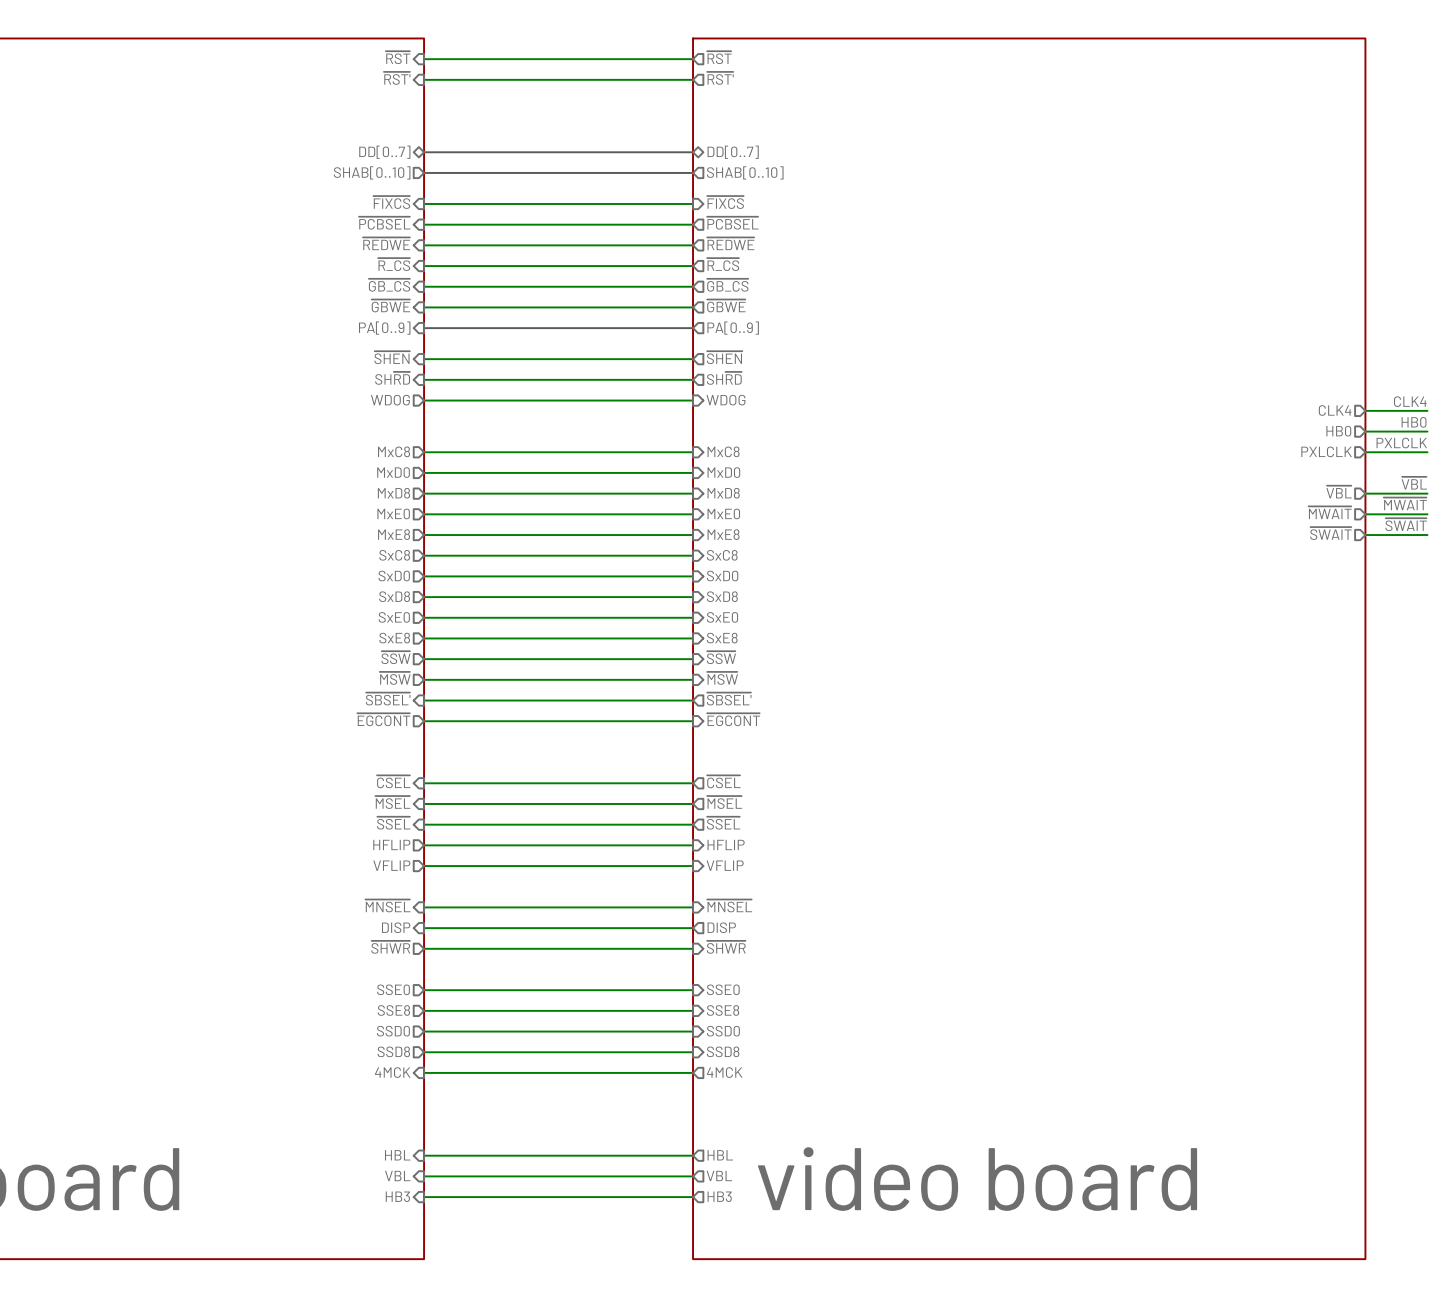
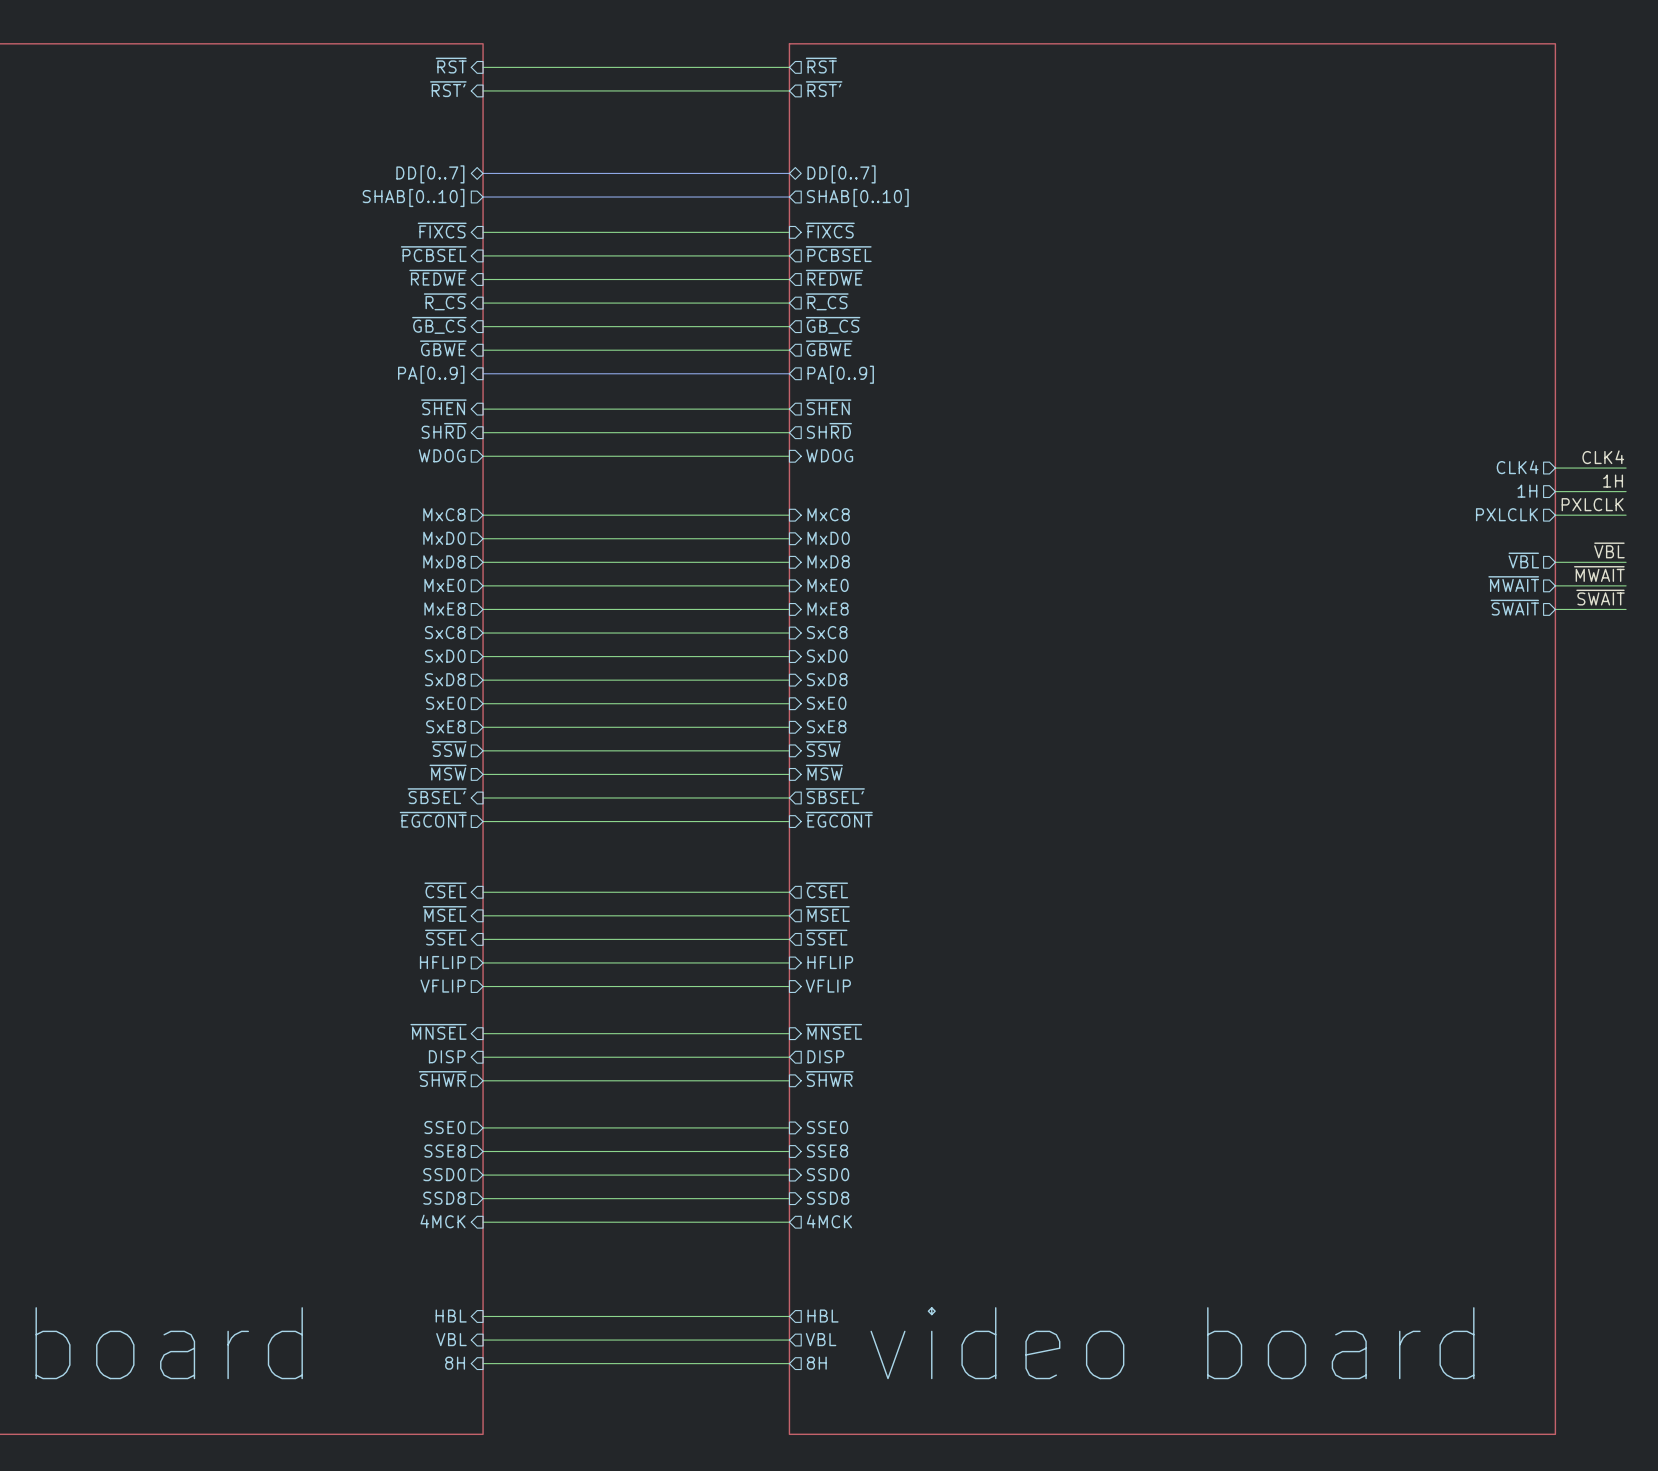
label: HB0 (1414, 422) -> 1H (1613, 481)
sheet pin: HB0 (1338, 431) -> 1H (1527, 491)
sheet pin: HB3 (397, 1196) -> 8H (455, 1363)
sheet pin: HB3 (719, 1196) -> 8H (816, 1363)

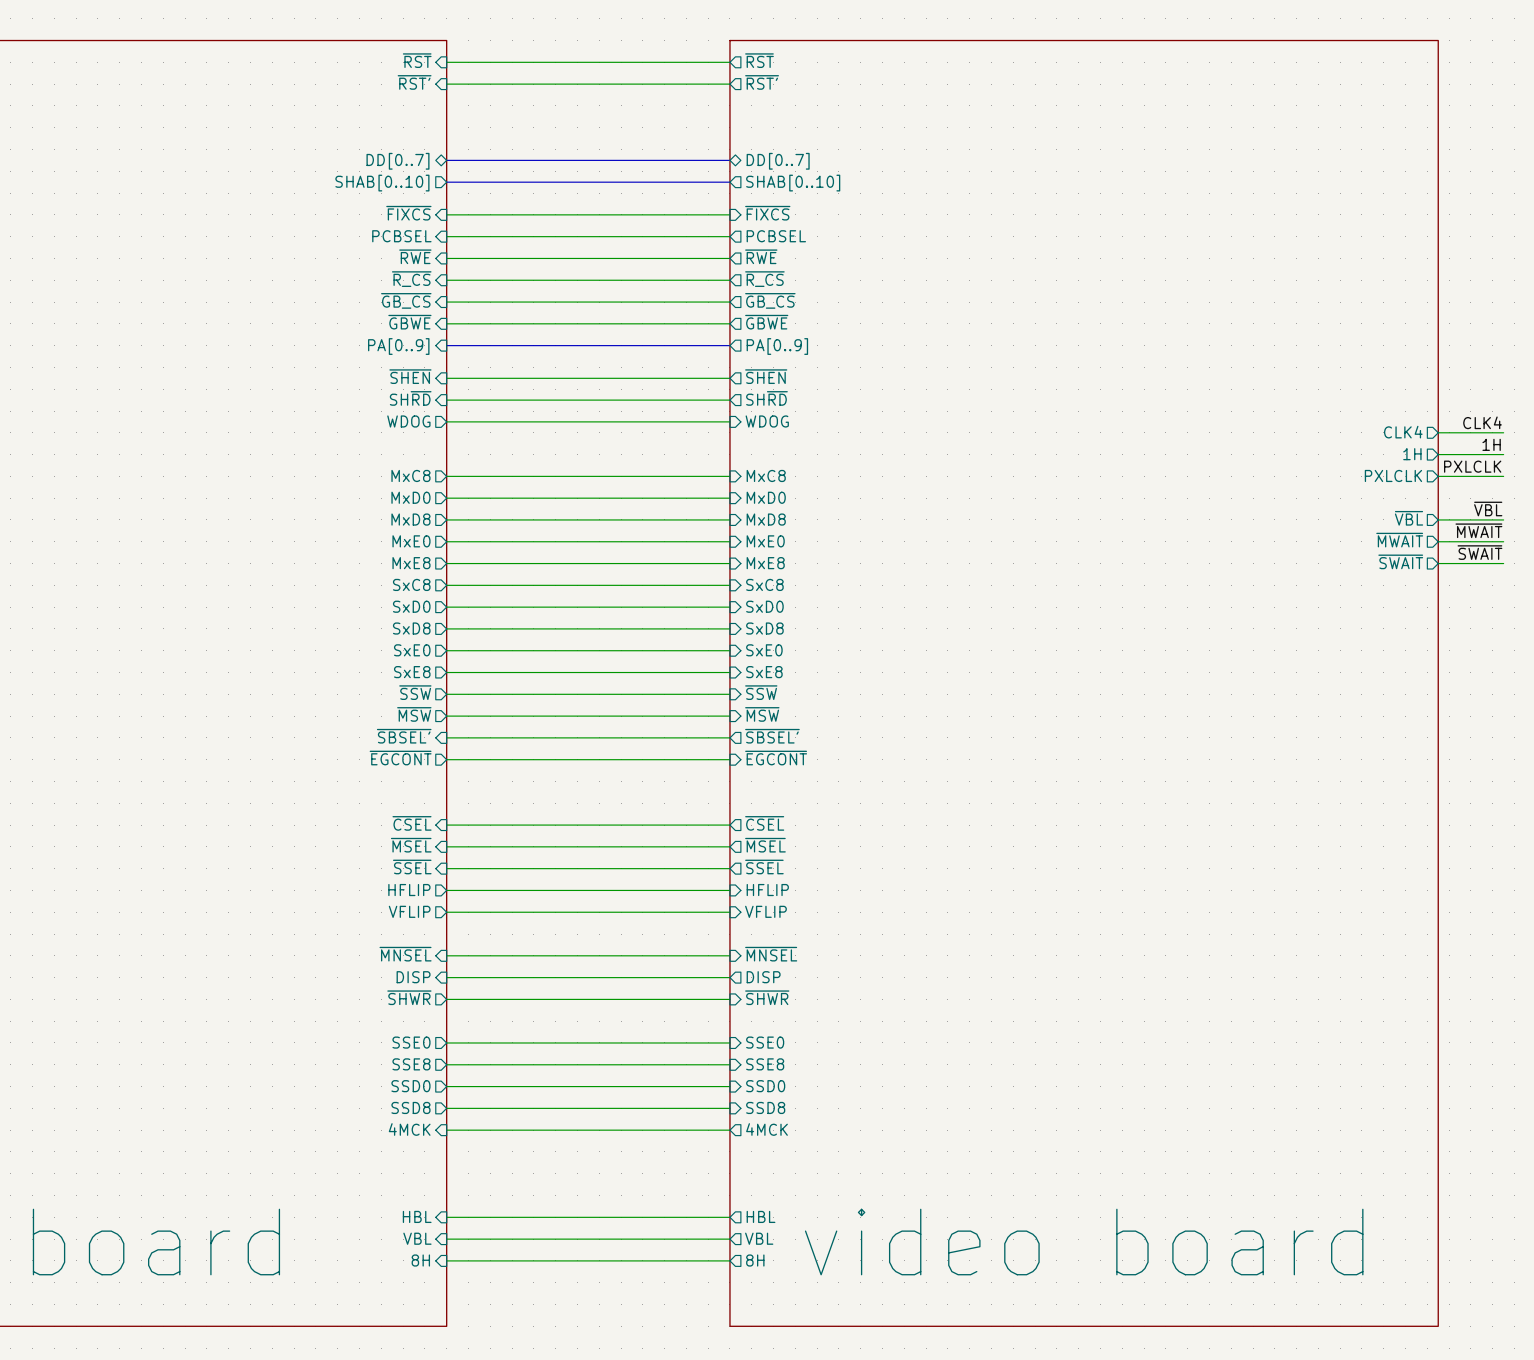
sheet pin: ~{PCBSEL} (433, 254) -> PCBSEL (401, 236)
sheet pin: ~{PCBSEL} (838, 254) -> PCBSEL (776, 236)
sheet pin: ~{REDWE} (437, 277) -> ~{RWE} (415, 256)
sheet pin: ~{REDWE} (834, 277) -> ~{RWE} (761, 256)

